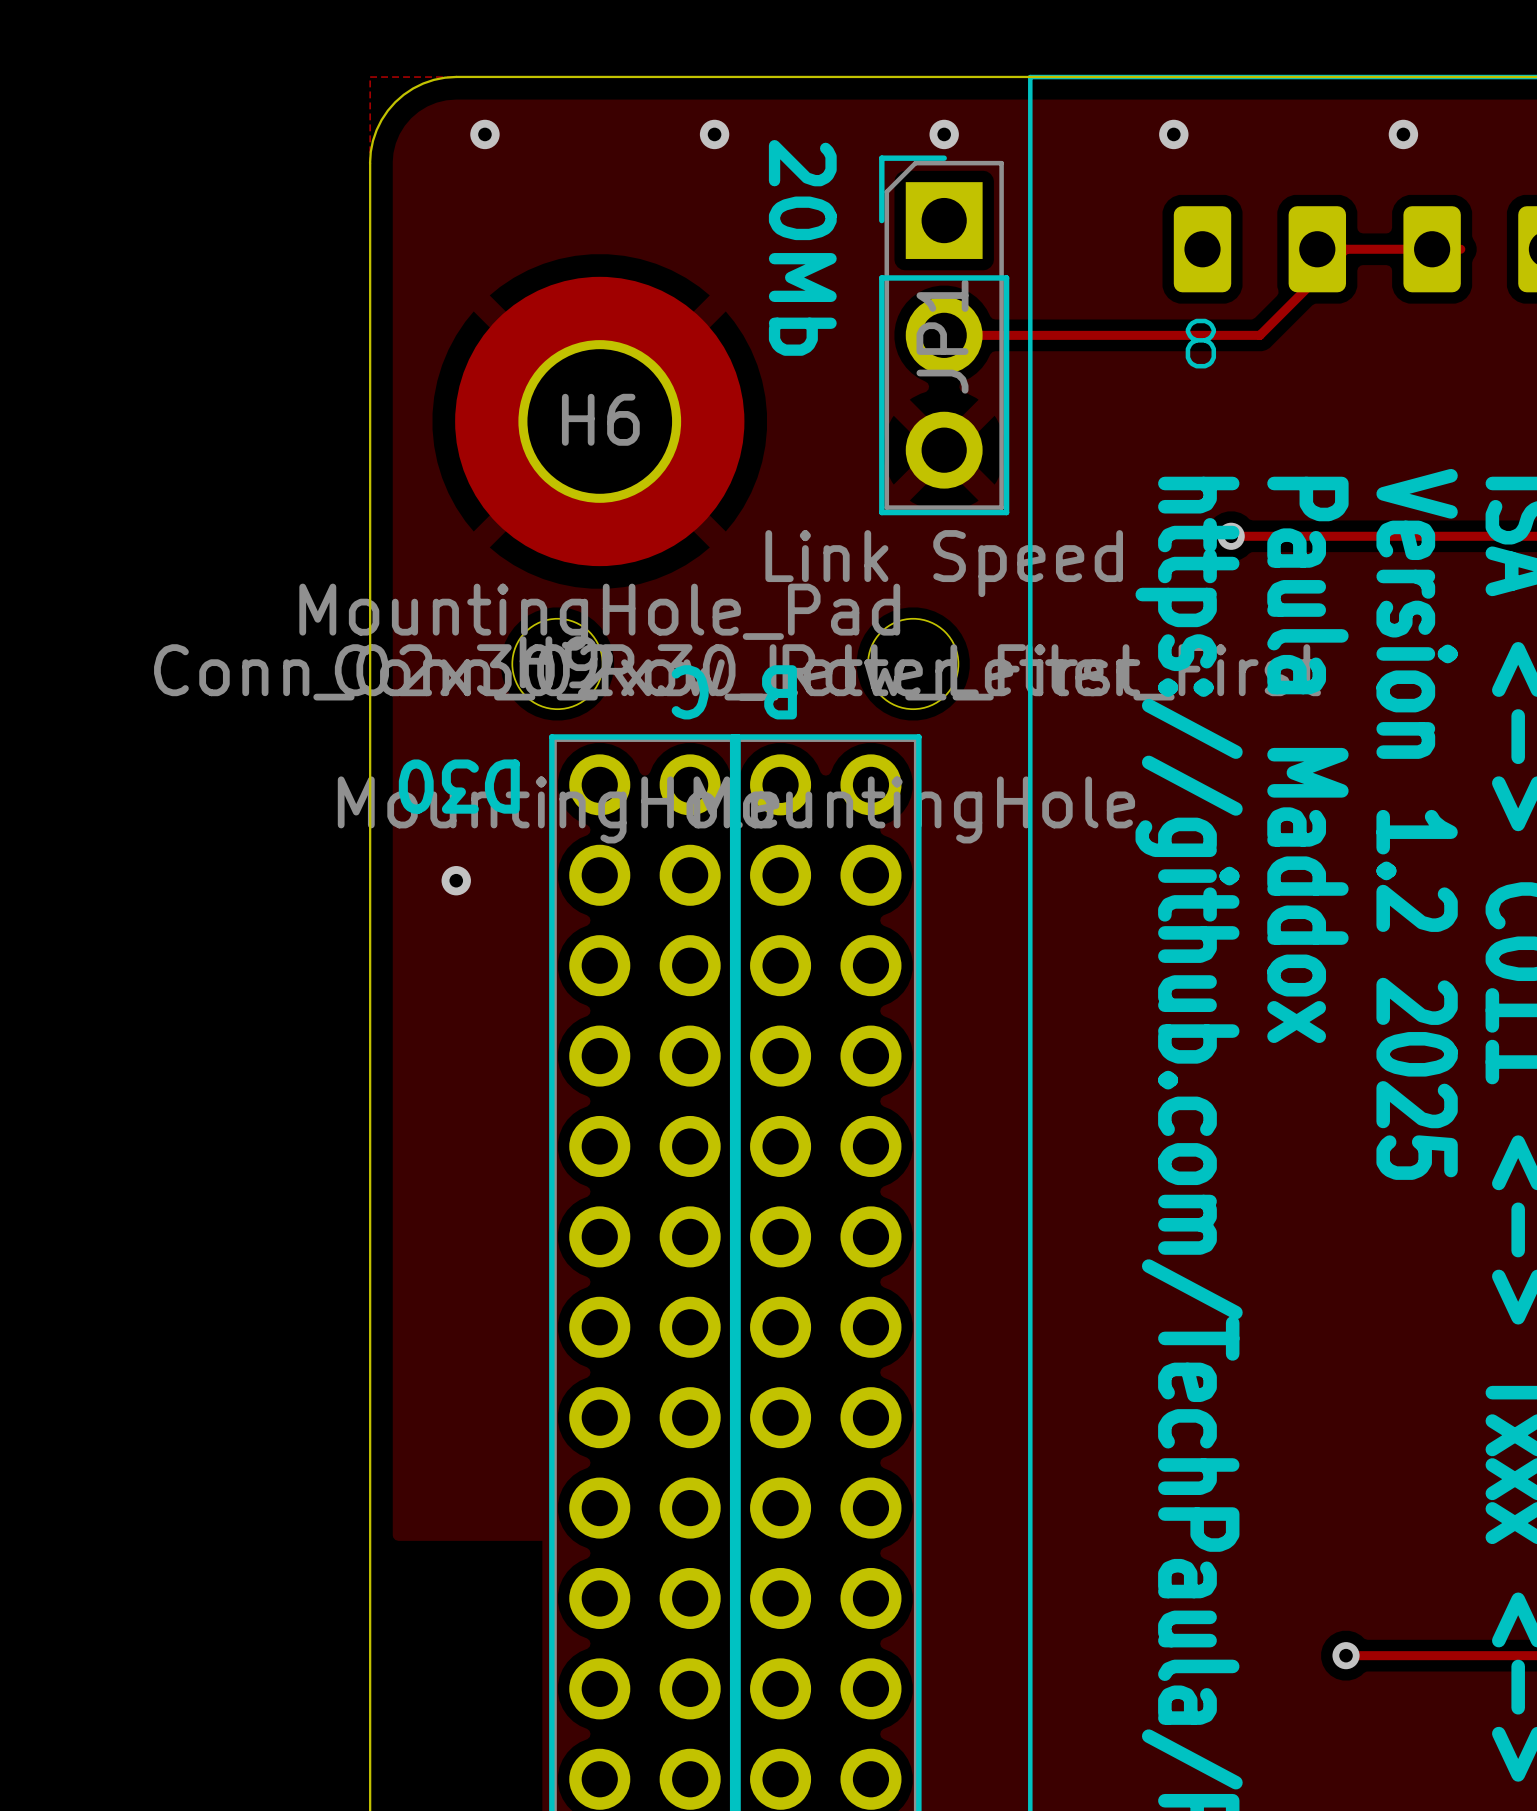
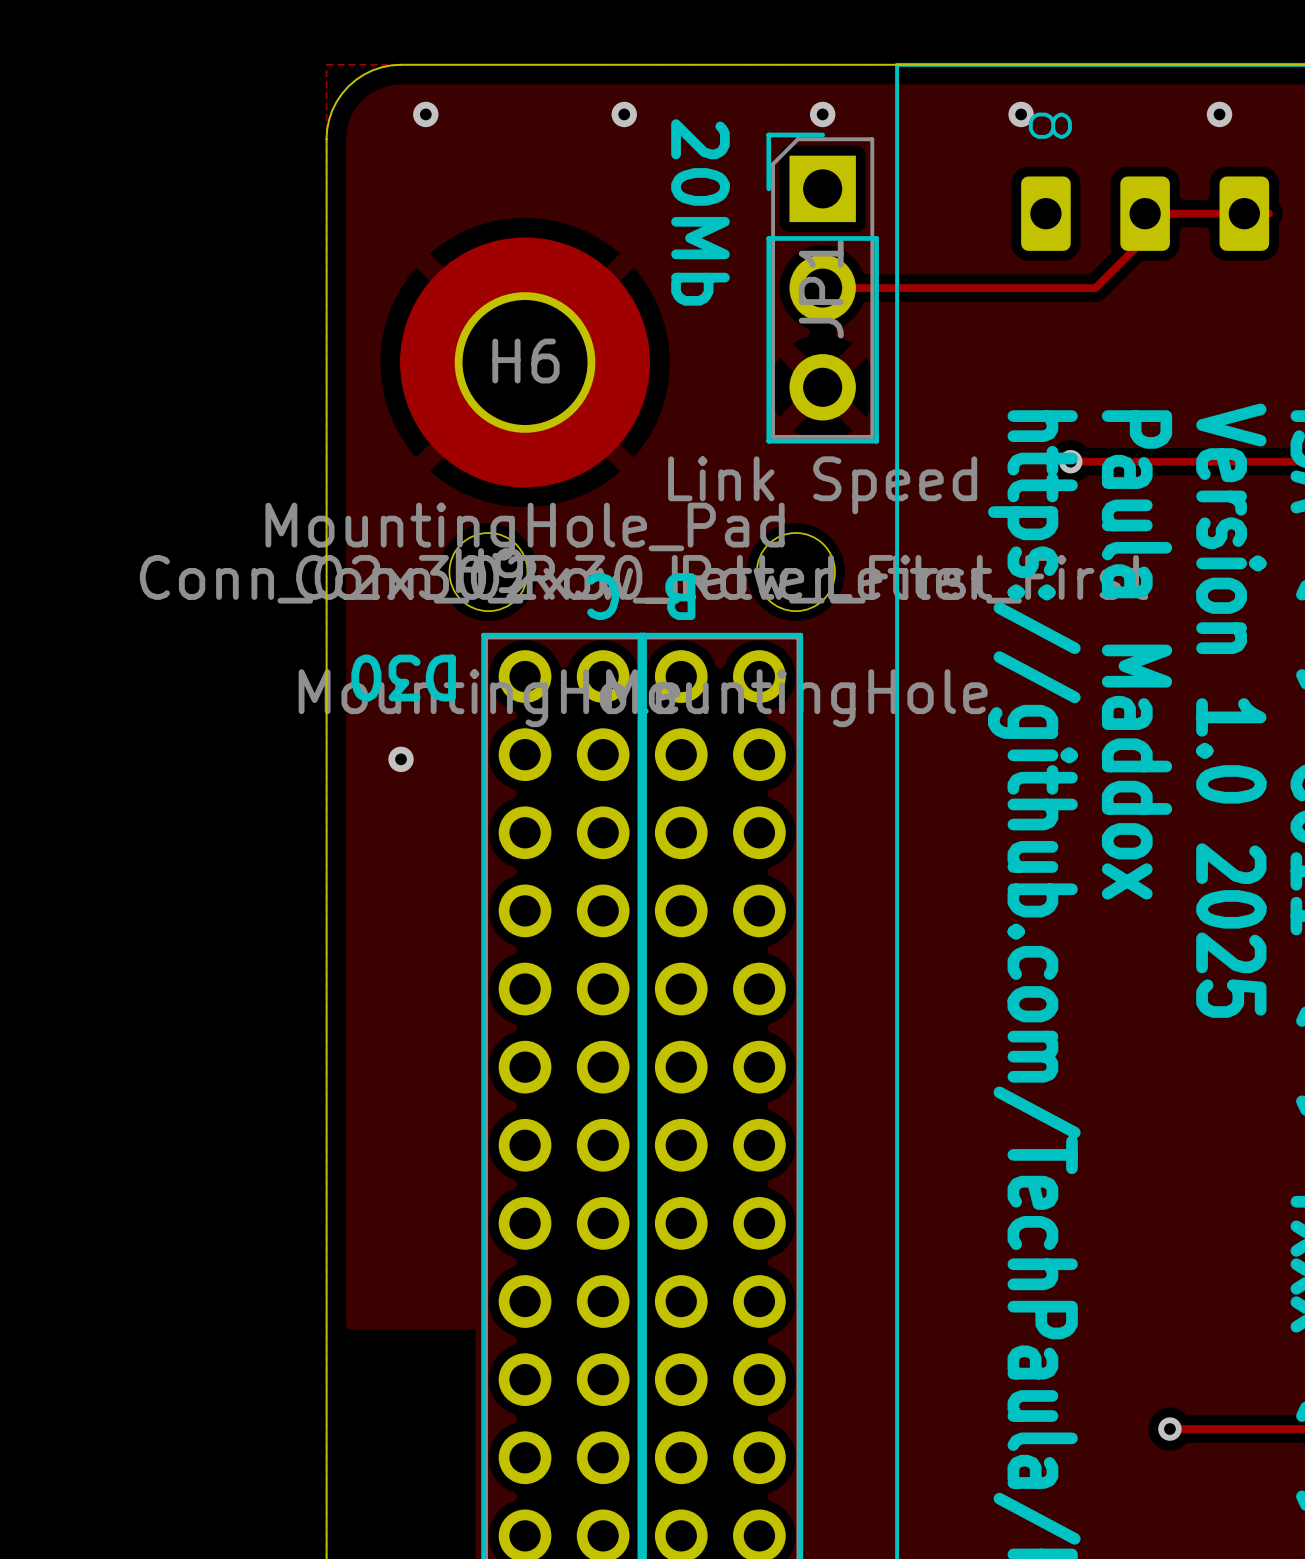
part text rotation: 0° (1200, 343) -> 90° clockwise (1050, 125)
part text position: 8 (1200, 343) -> 8 (1050, 125)
text: Version 1.2 2025 (1417, 824) -> Version 1.0 2025 (1231, 710)

